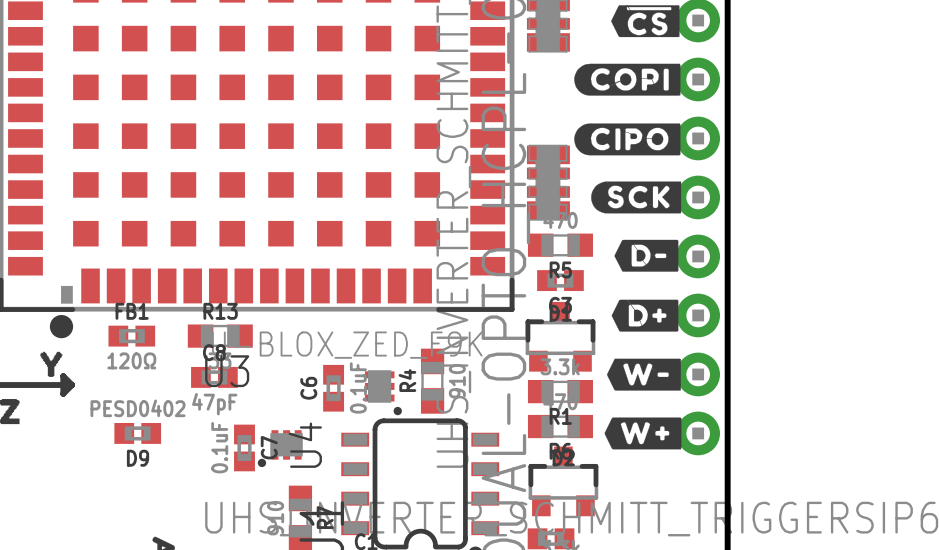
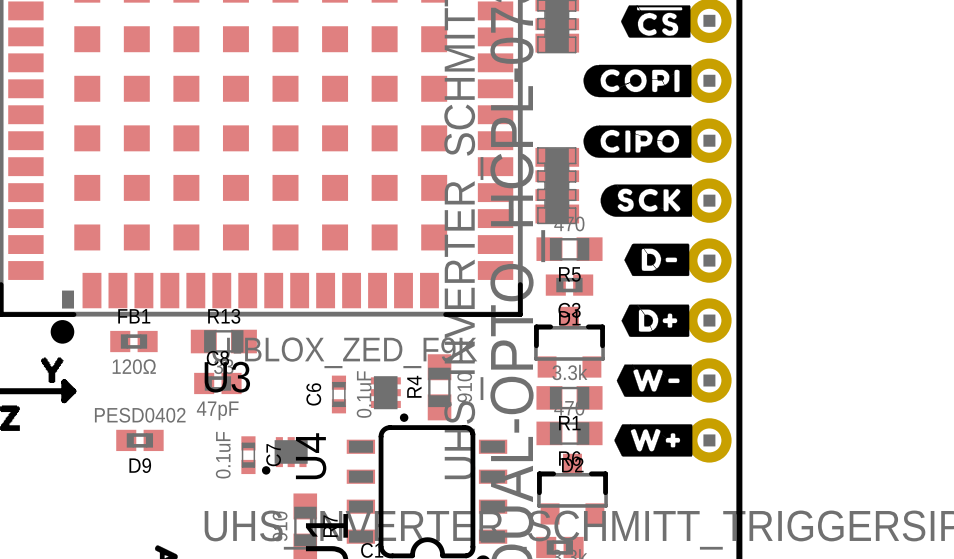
C6 footprint: [323, 364, 345, 412] -> [331, 375, 347, 414]
C7 footprint: [234, 424, 255, 472] -> [241, 436, 256, 475]

